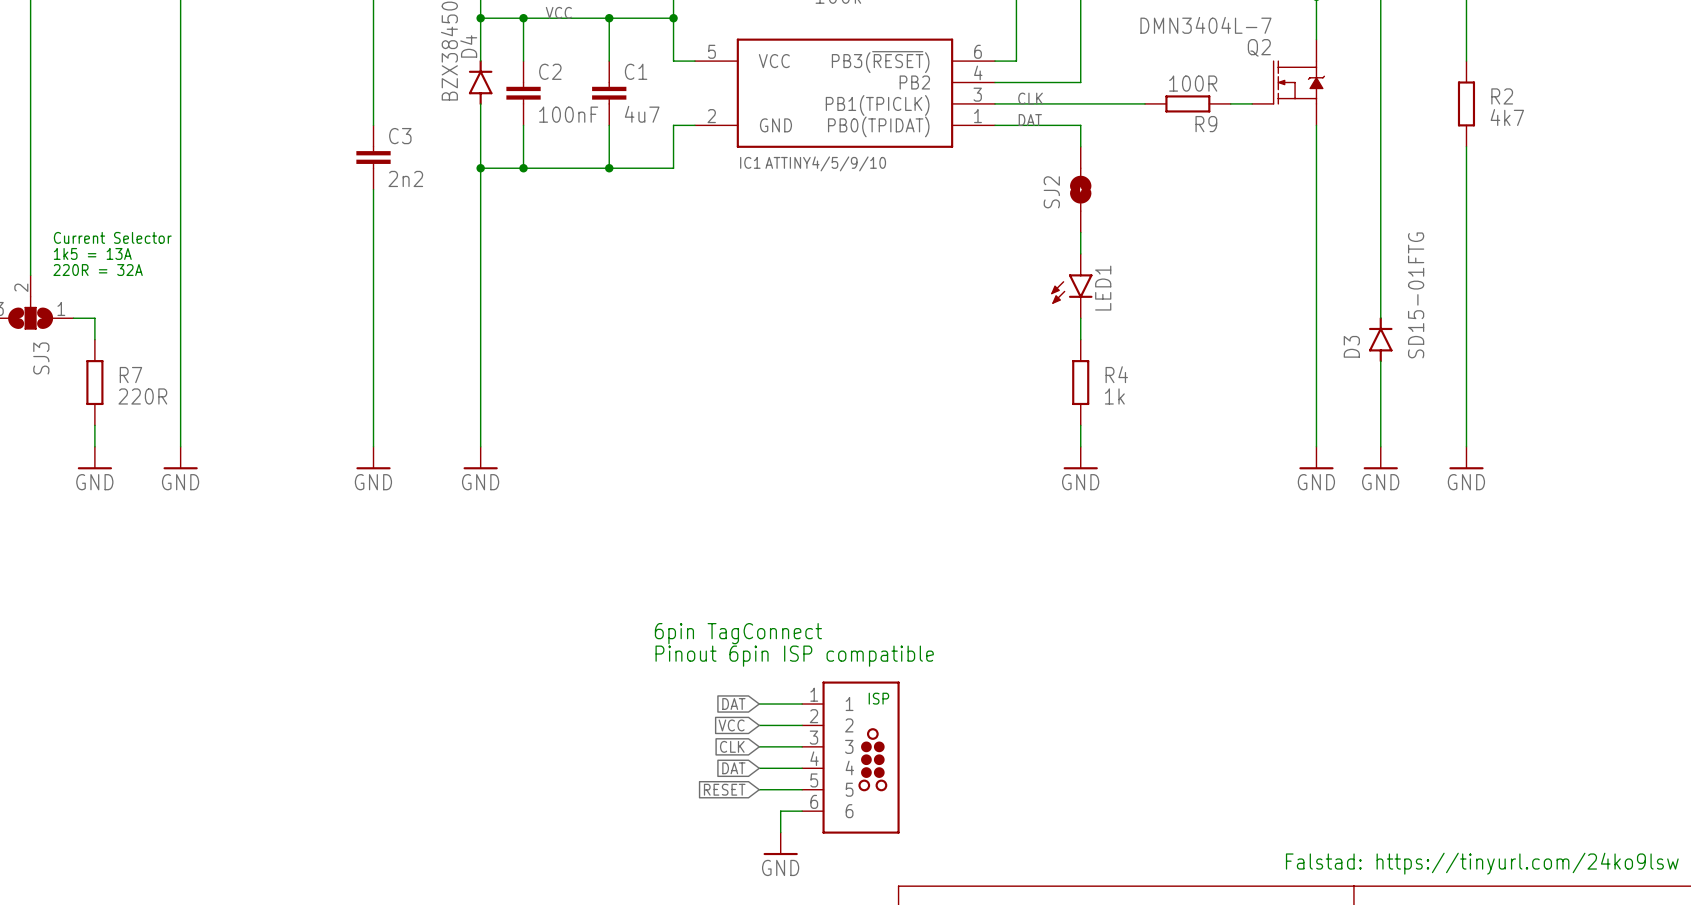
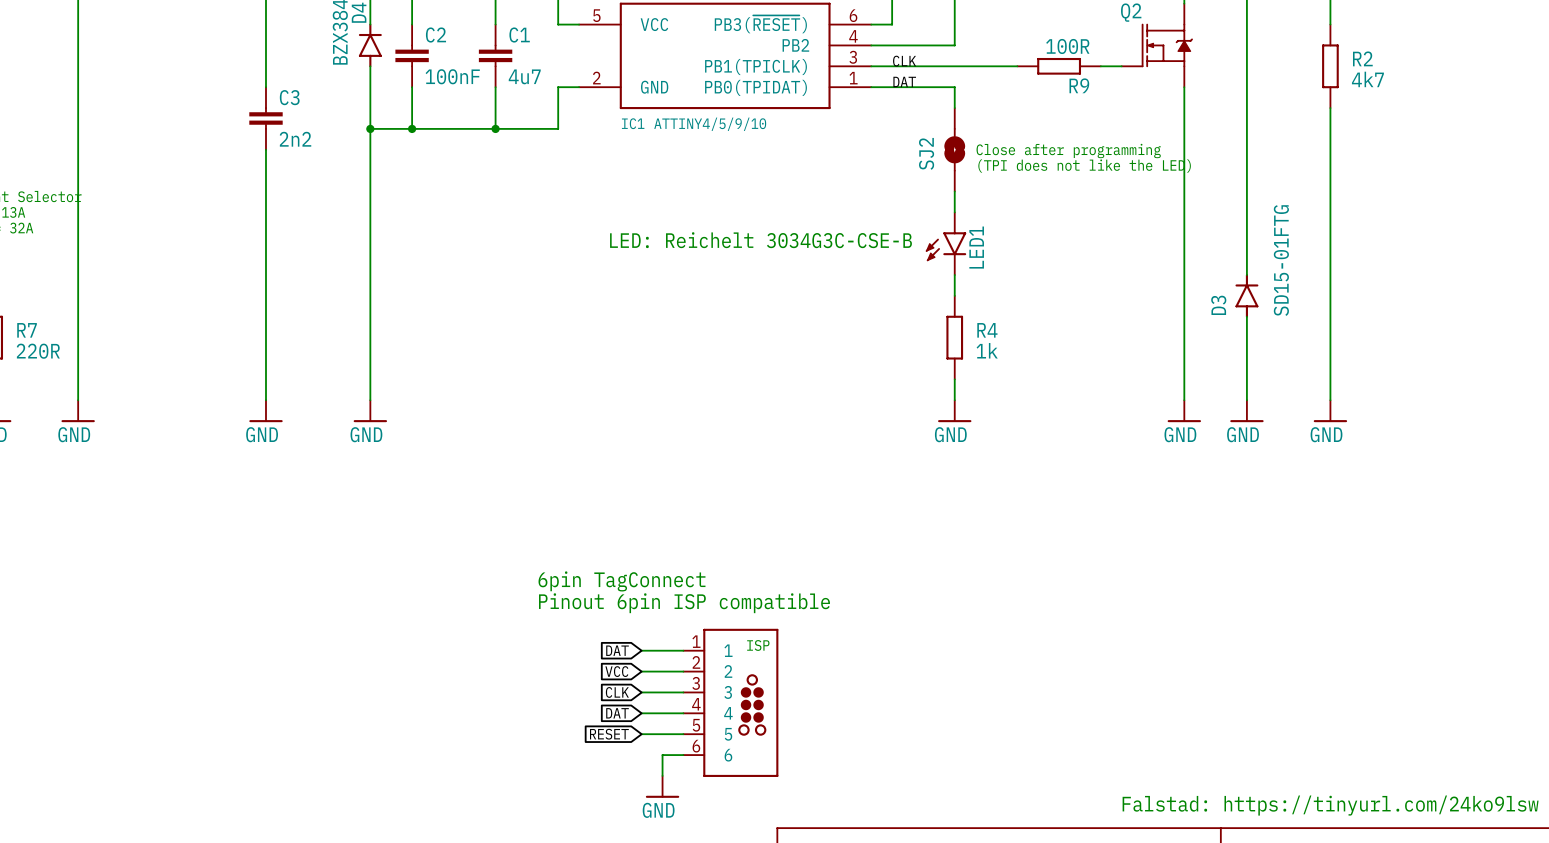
text: none -> Close after programming (1068, 151)
text: none -> (TPI does not like the LED) (1084, 166)
text: none -> LED: Reichelt 3034G3C-CSE-B (761, 240)

